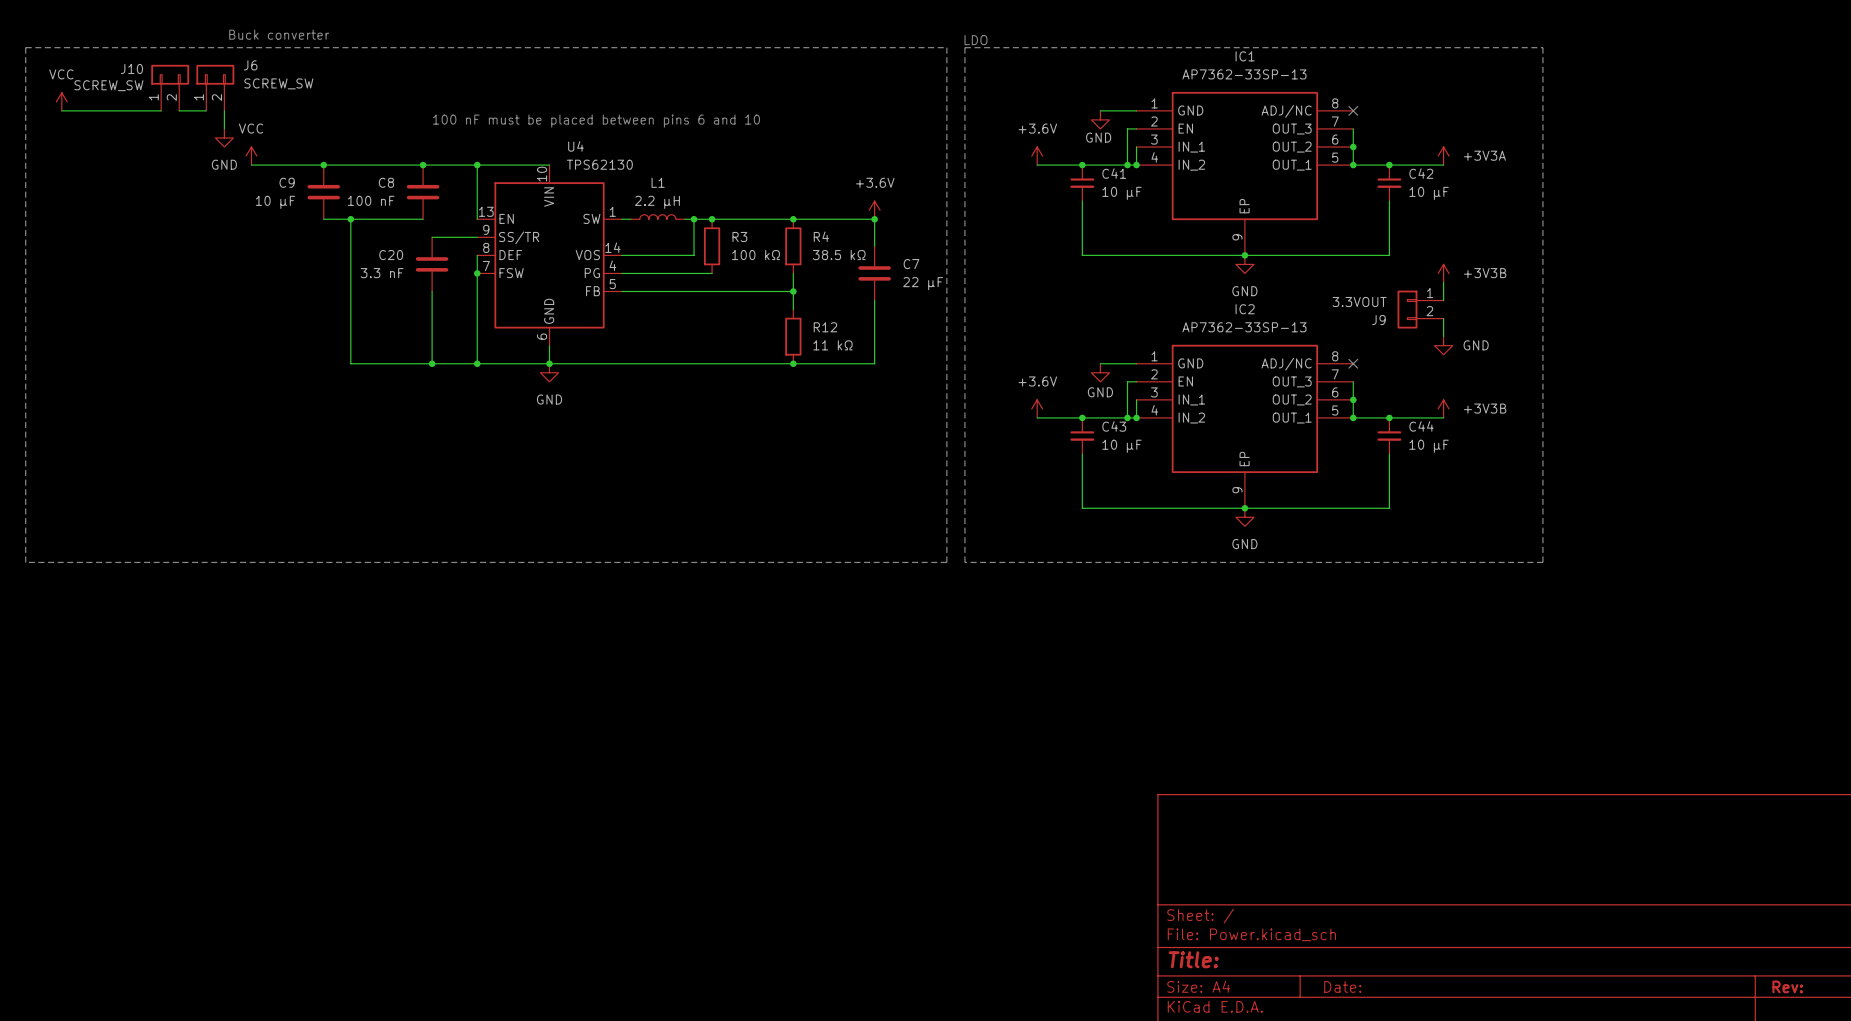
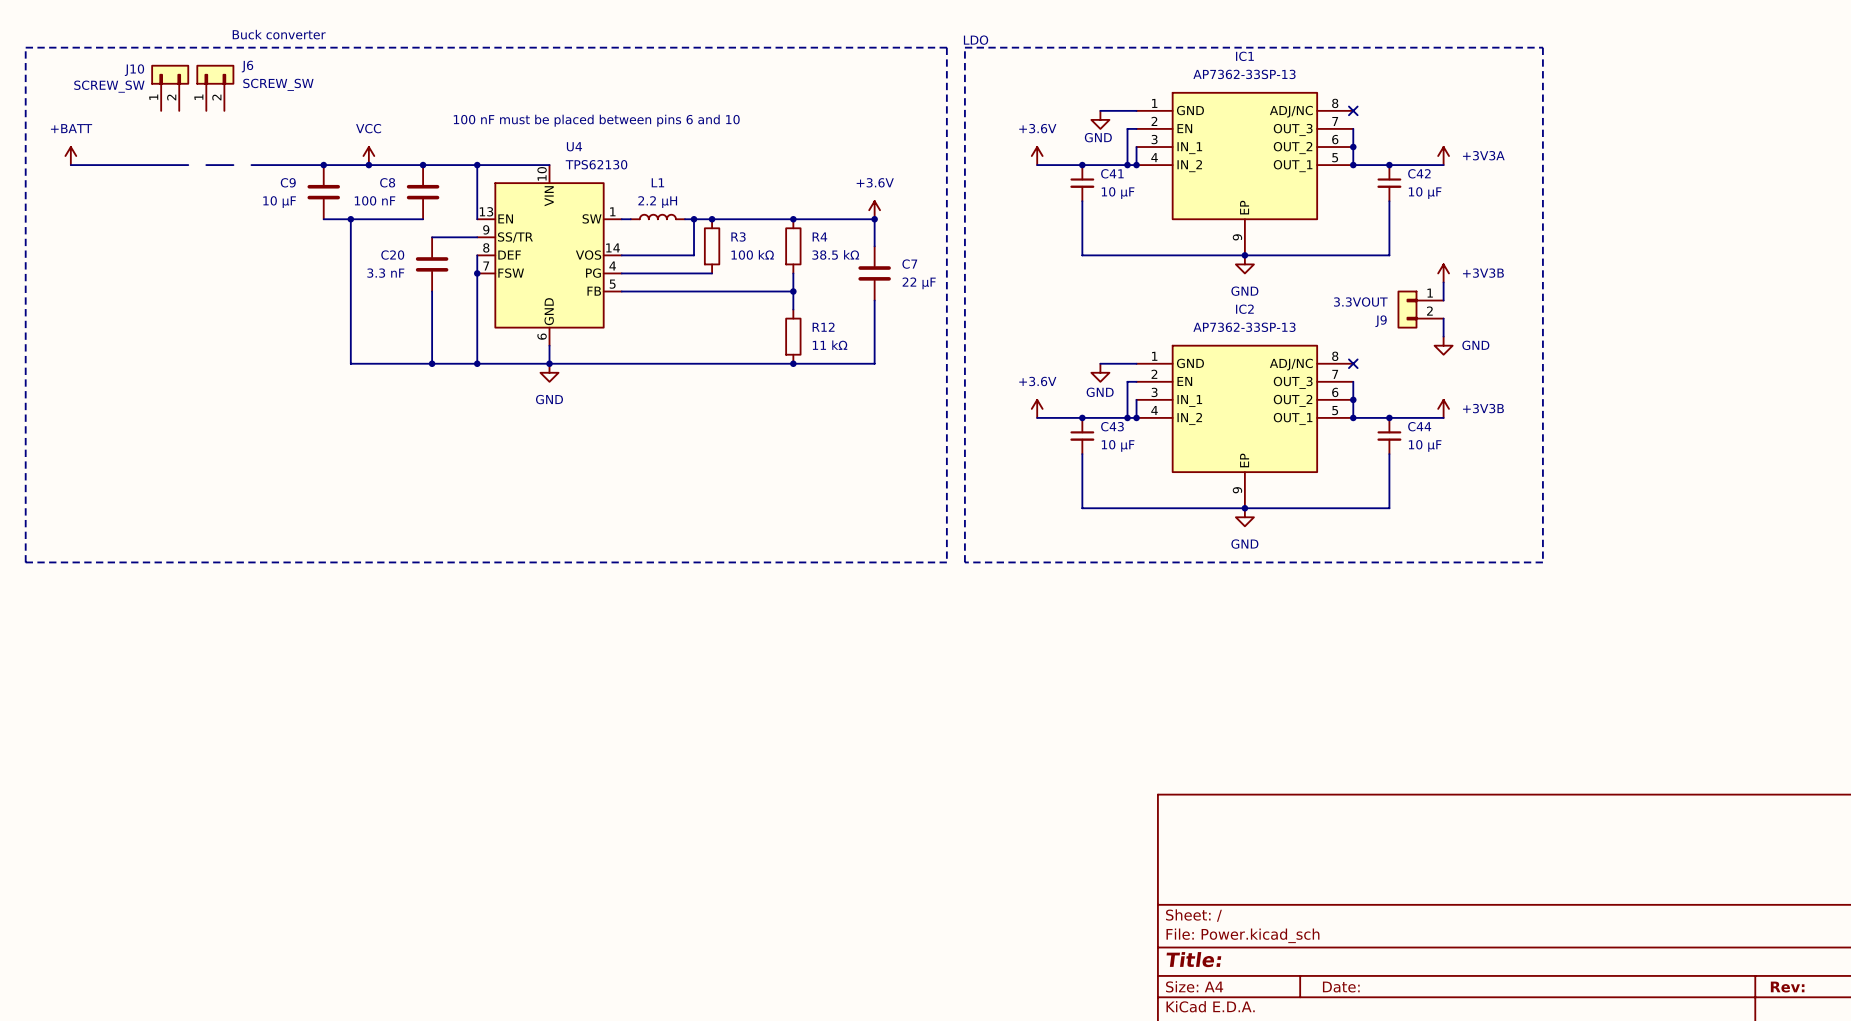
power symbol: VCC (61, 101) -> none
wire: (61, 110) (161, 110) -> none
wire: (179, 110) (206, 110) -> (206, 165) (233, 165)
wire: (224, 110) (224, 128) -> none
power symbol: GND (224, 137) -> none
power symbol: none -> +BATT (70, 156)
power symbol position: VCC (251, 156) -> VCC (368, 156)
wire: none -> (70, 165) (188, 165)
junction: none -> (368, 165)

